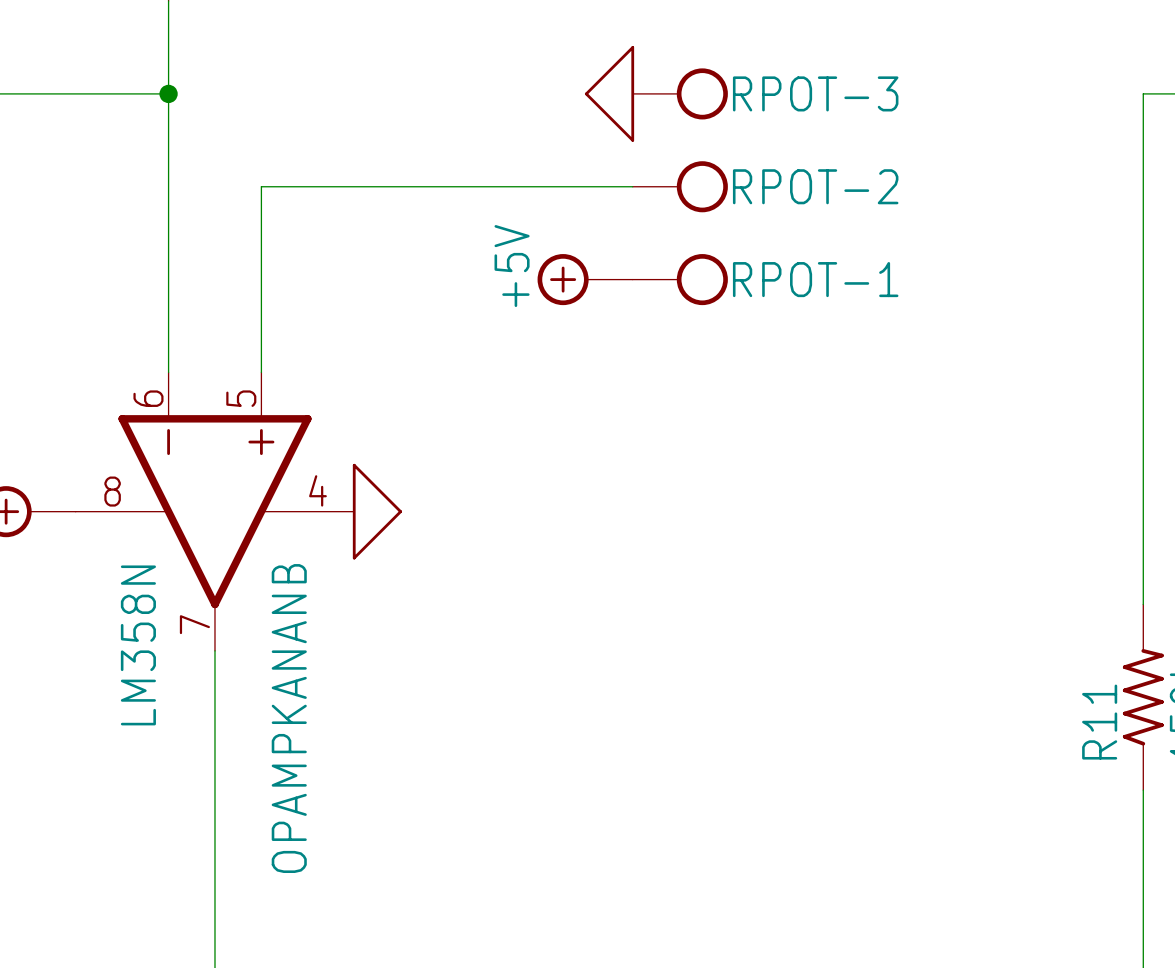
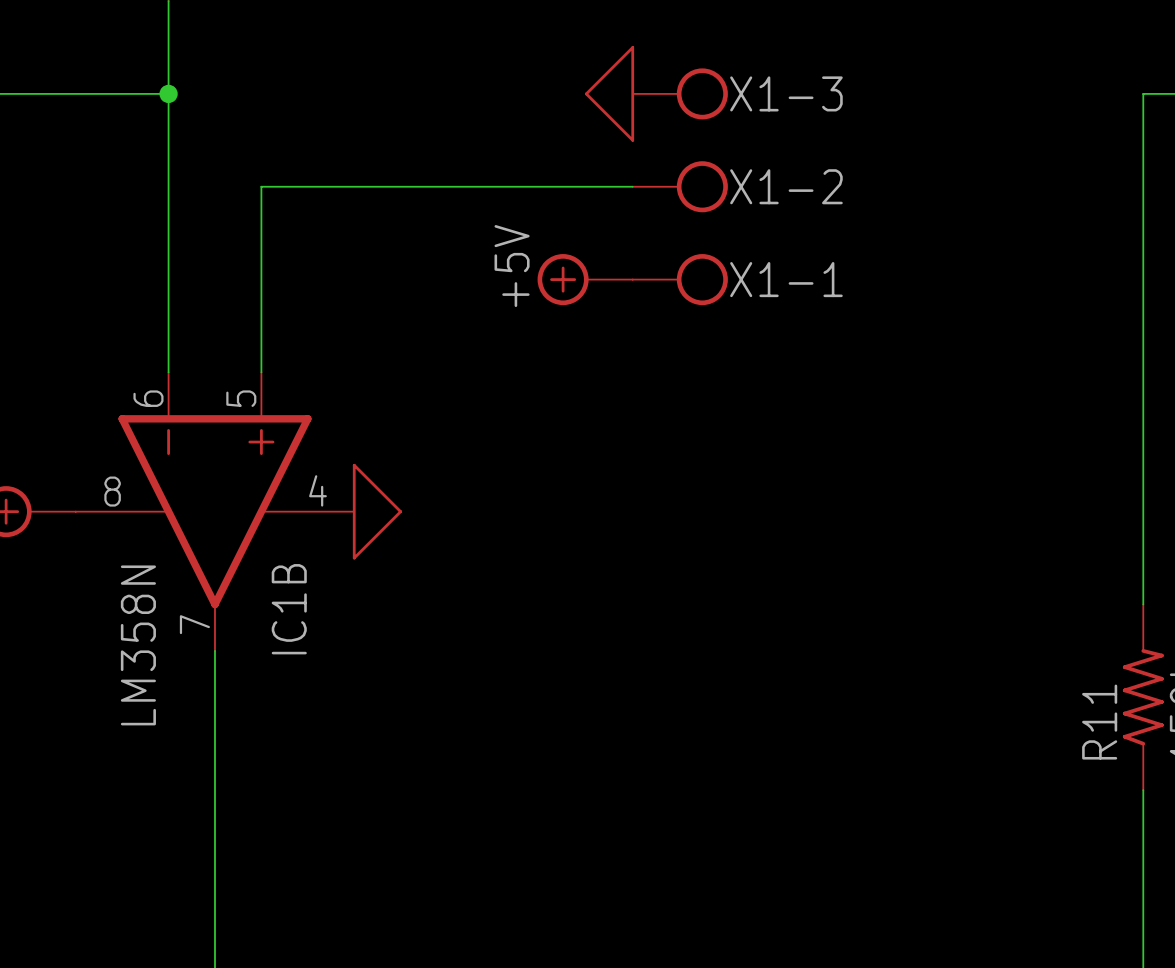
RPOT-3 name: RPOT-3 (815, 93) -> X1-3 (786, 93)
RPOT-2 name: RPOT-2 (815, 186) -> X1-2 (786, 186)
RPOT-1 name: RPOT-1 (815, 279) -> X1-1 (786, 279)
OPAMPKANANB name: OPAMPKANANB (289, 718) -> IC1B (289, 609)

